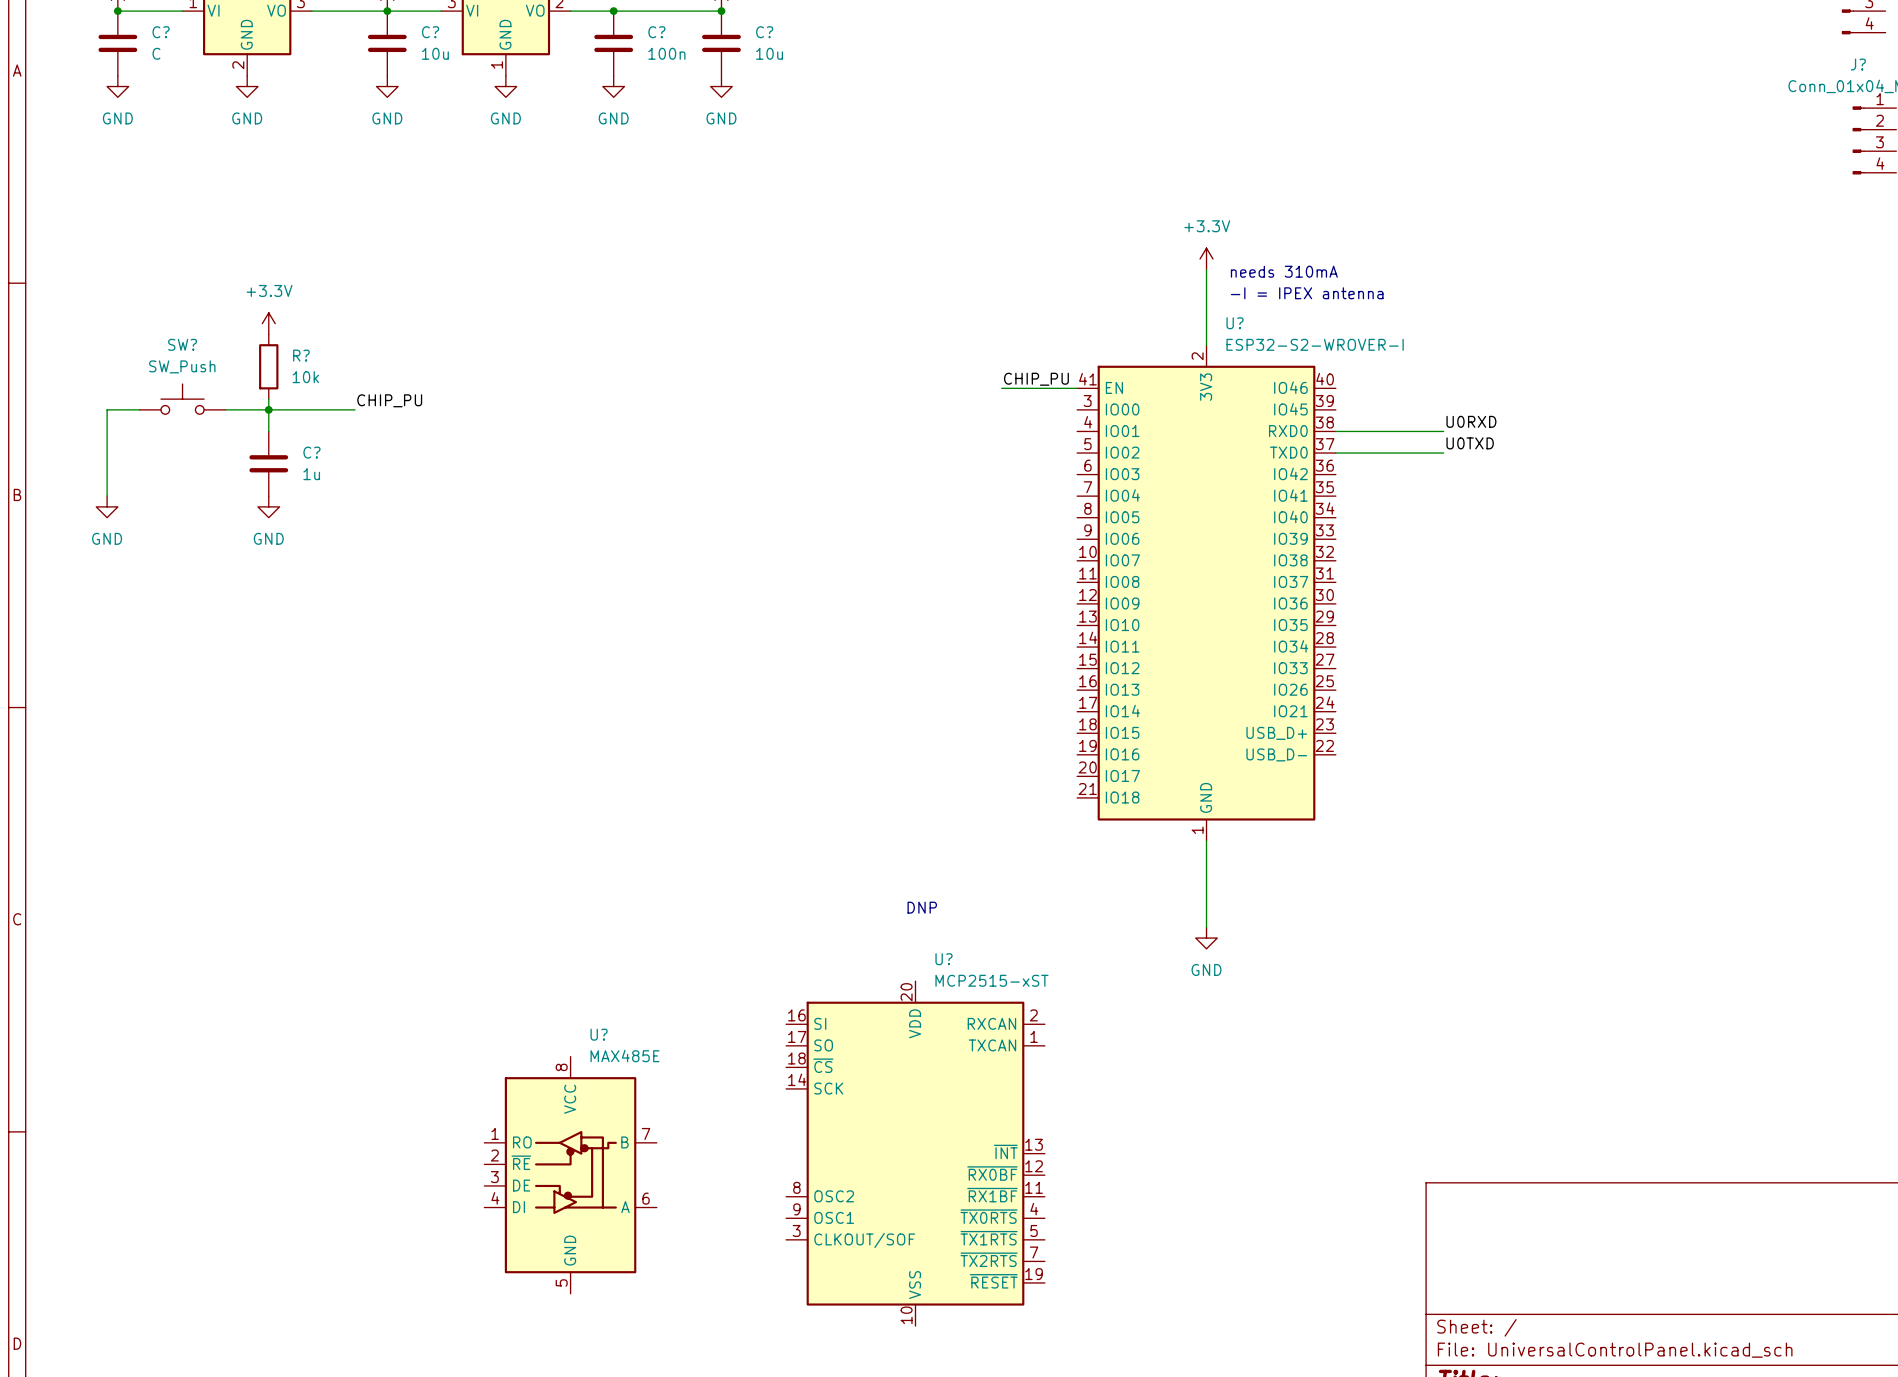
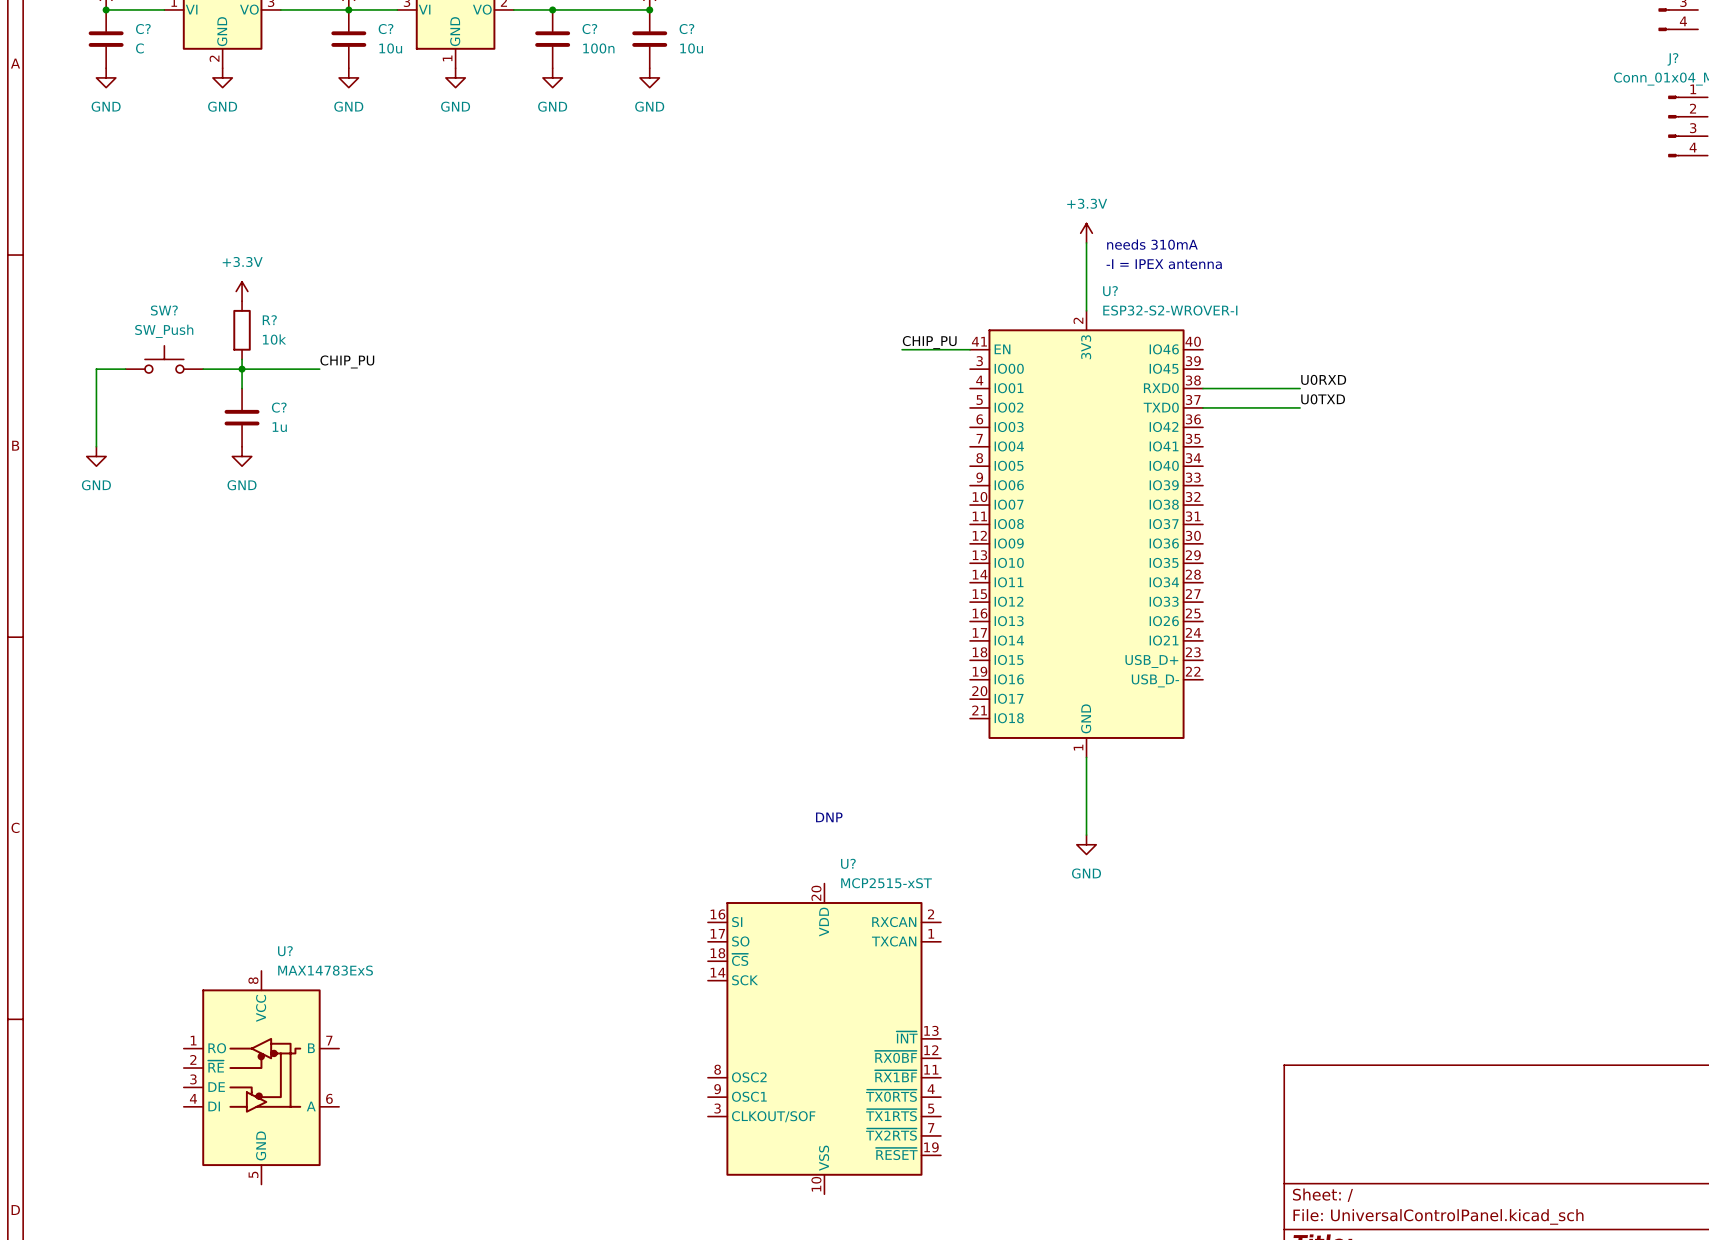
U?: MAX485E (570, 1175) -> none
U?: none -> MAX14783ExS (261, 1077)

